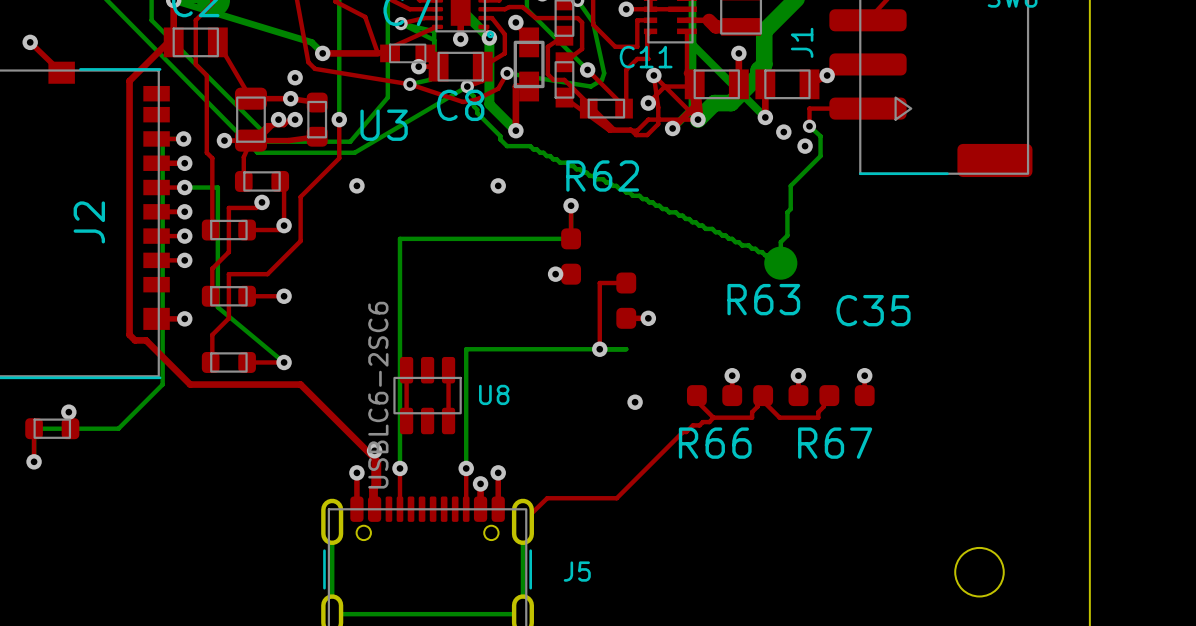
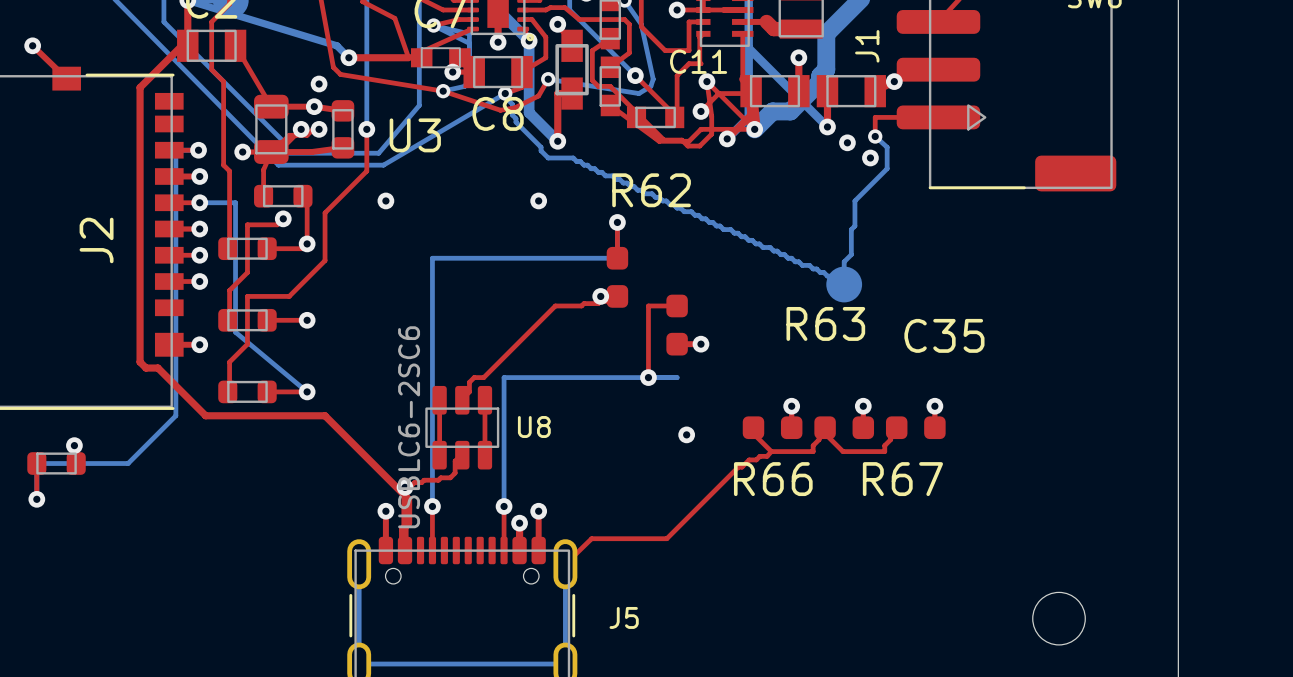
top track: none -> (617, 296) (612, 296) (607, 301) (600, 301) (598, 303) (555, 305) (483, 377) (474, 377) (469, 382) (469, 391) (462, 400)
top track: none -> (462, 455) (455, 461) (455, 473) (450, 477) (424, 480) (421, 482) (414, 482) (409, 487) (405, 487)

